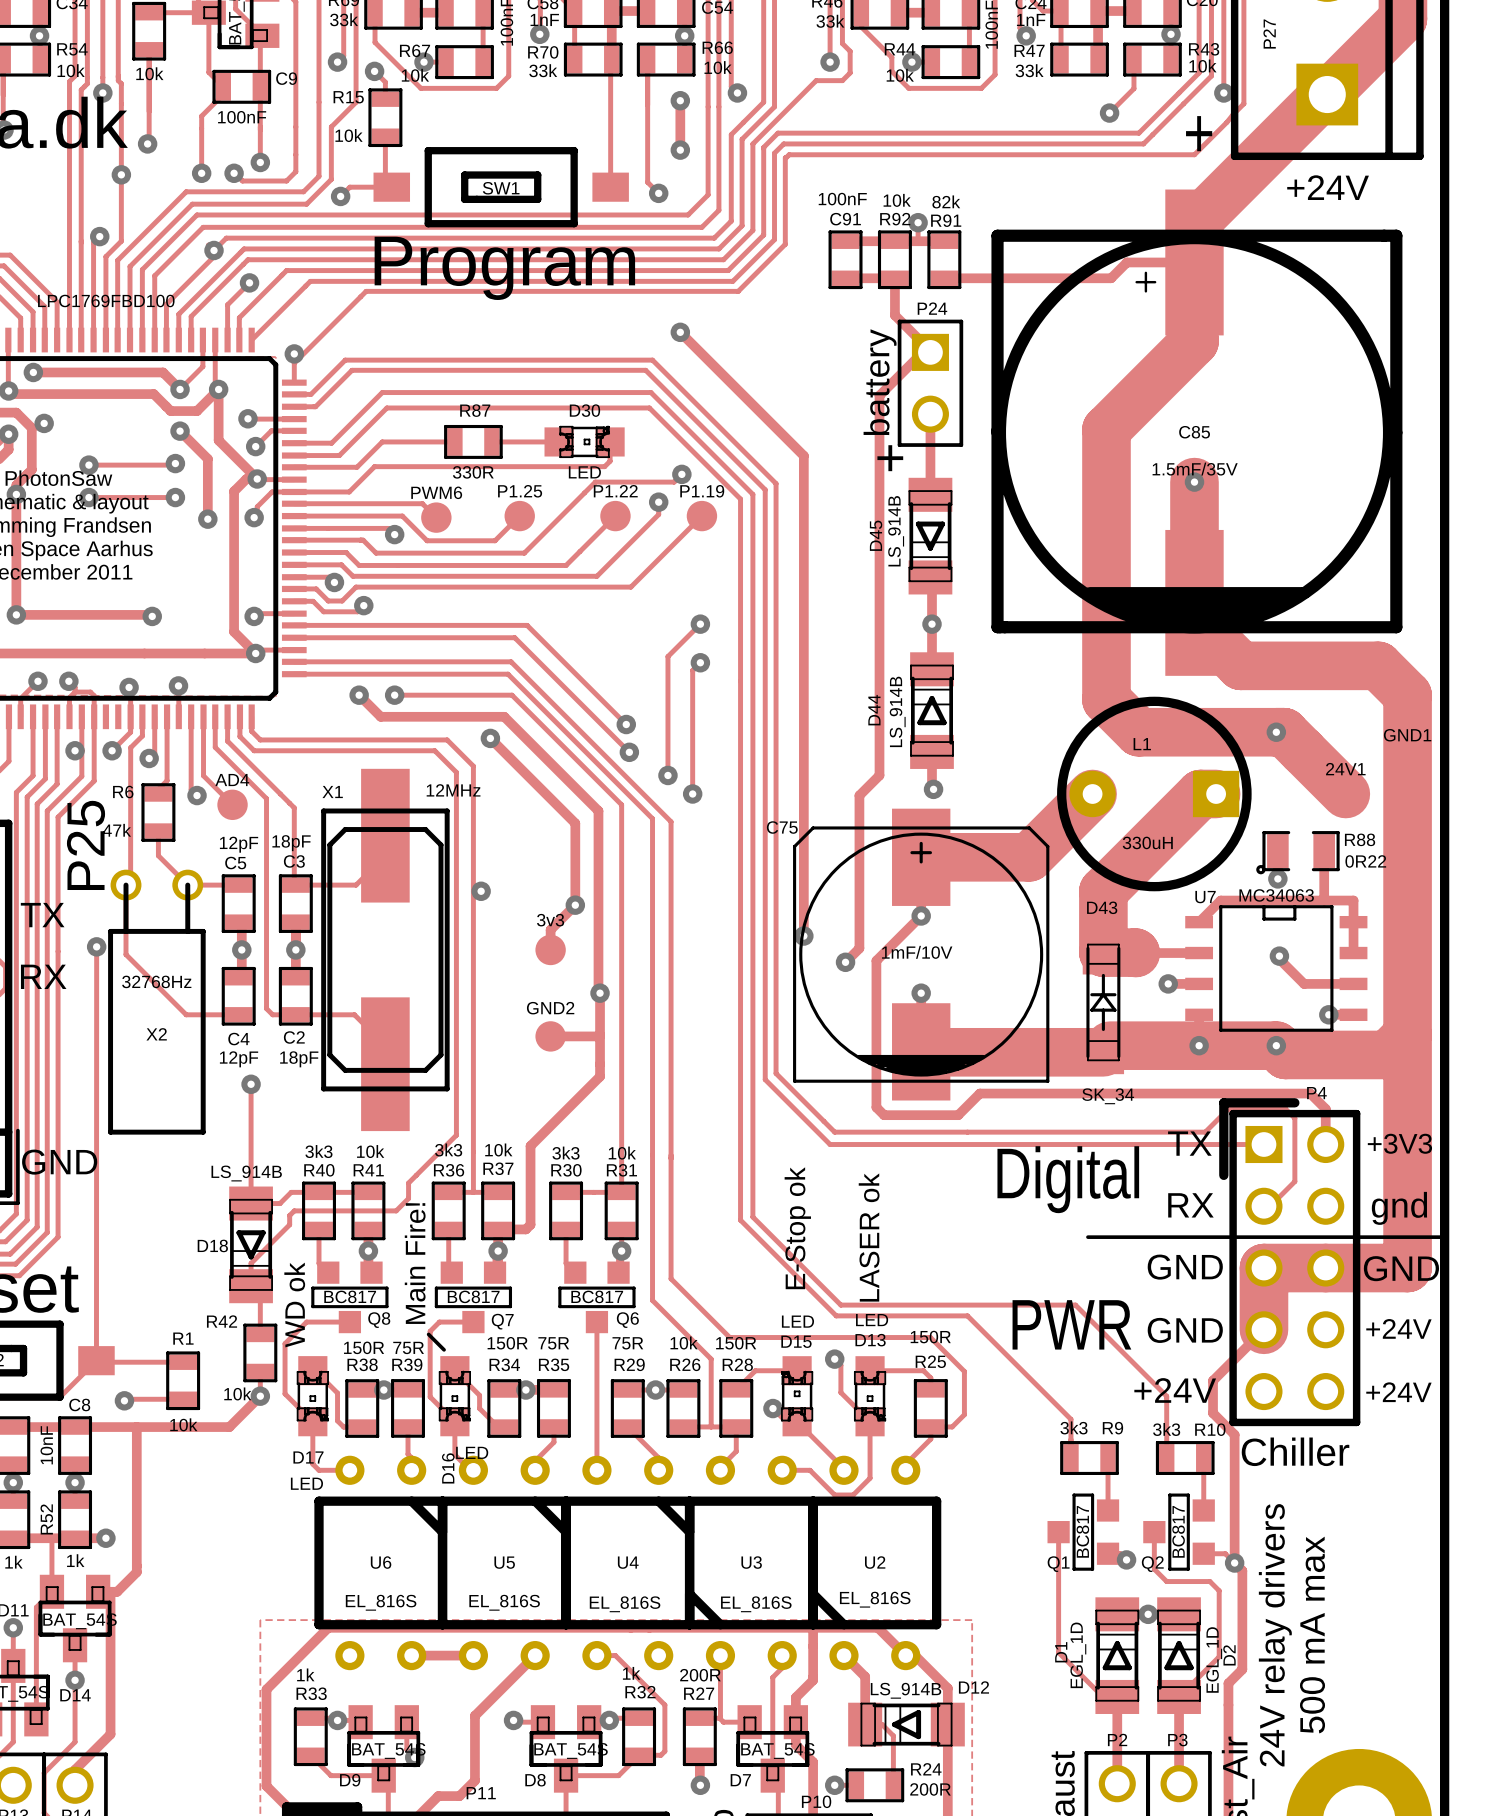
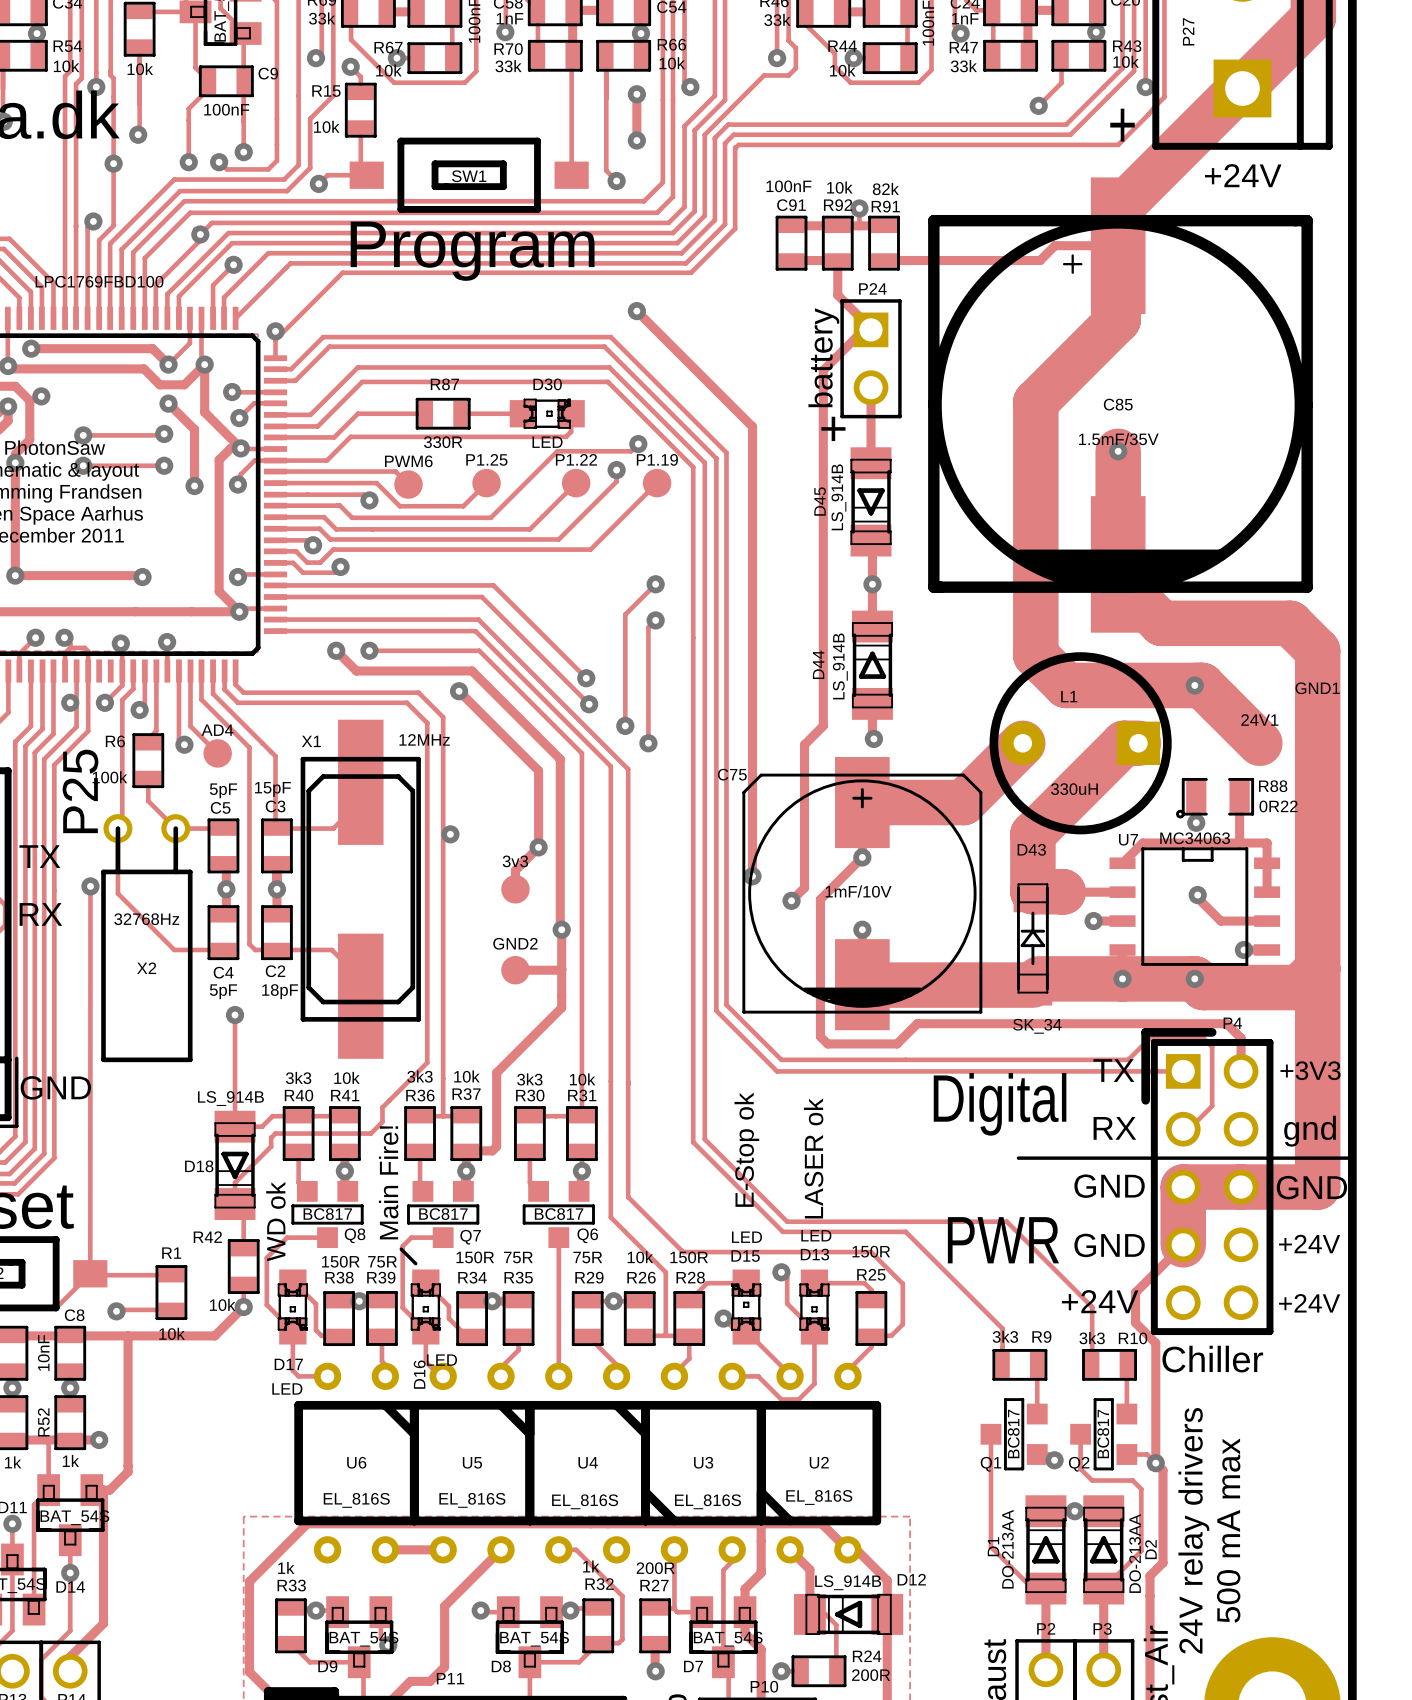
R6 value: 47k (116, 830) -> 100k (109, 777)
C3 value: 18pF (291, 843) -> 15pF (272, 789)
C5 value: 12pF (239, 844) -> 5pF (223, 790)
C4 value: 12pF (239, 1059) -> 5pF (223, 991)
D1 value: EGL_1D (1078, 1655) -> DO-213AA (1007, 1549)
D2 value: EGL_1D (1214, 1659) -> DO-213AA (1135, 1553)

